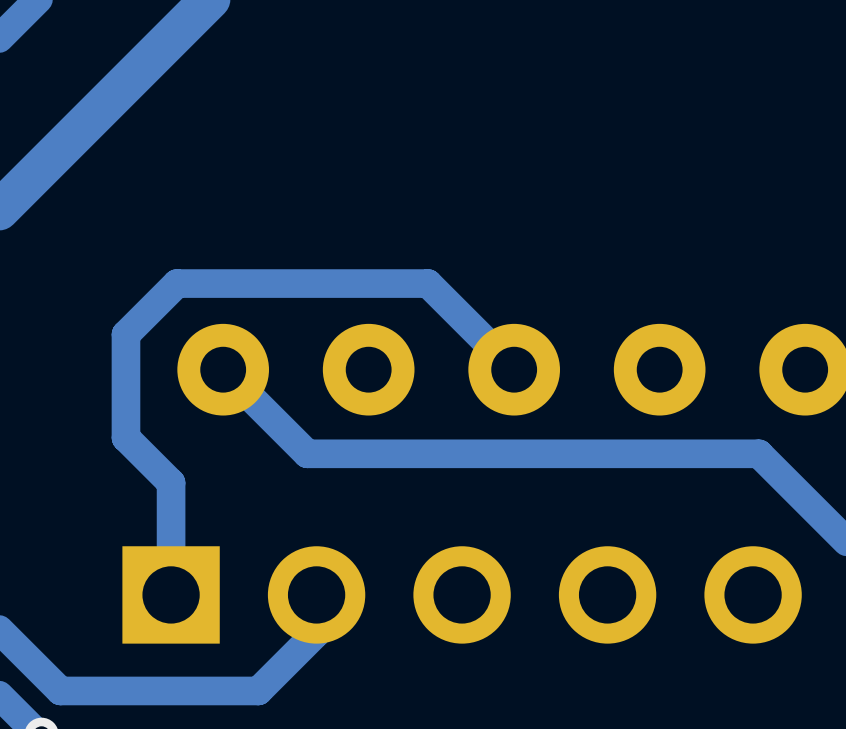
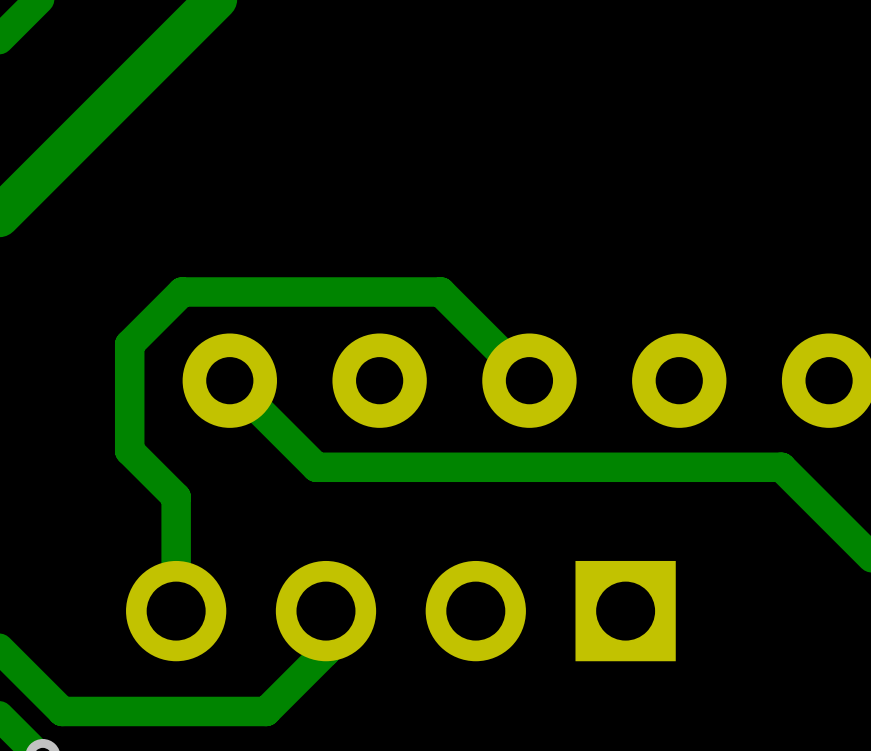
part: none -> (400, 611)
part: (462, 594) -> none

